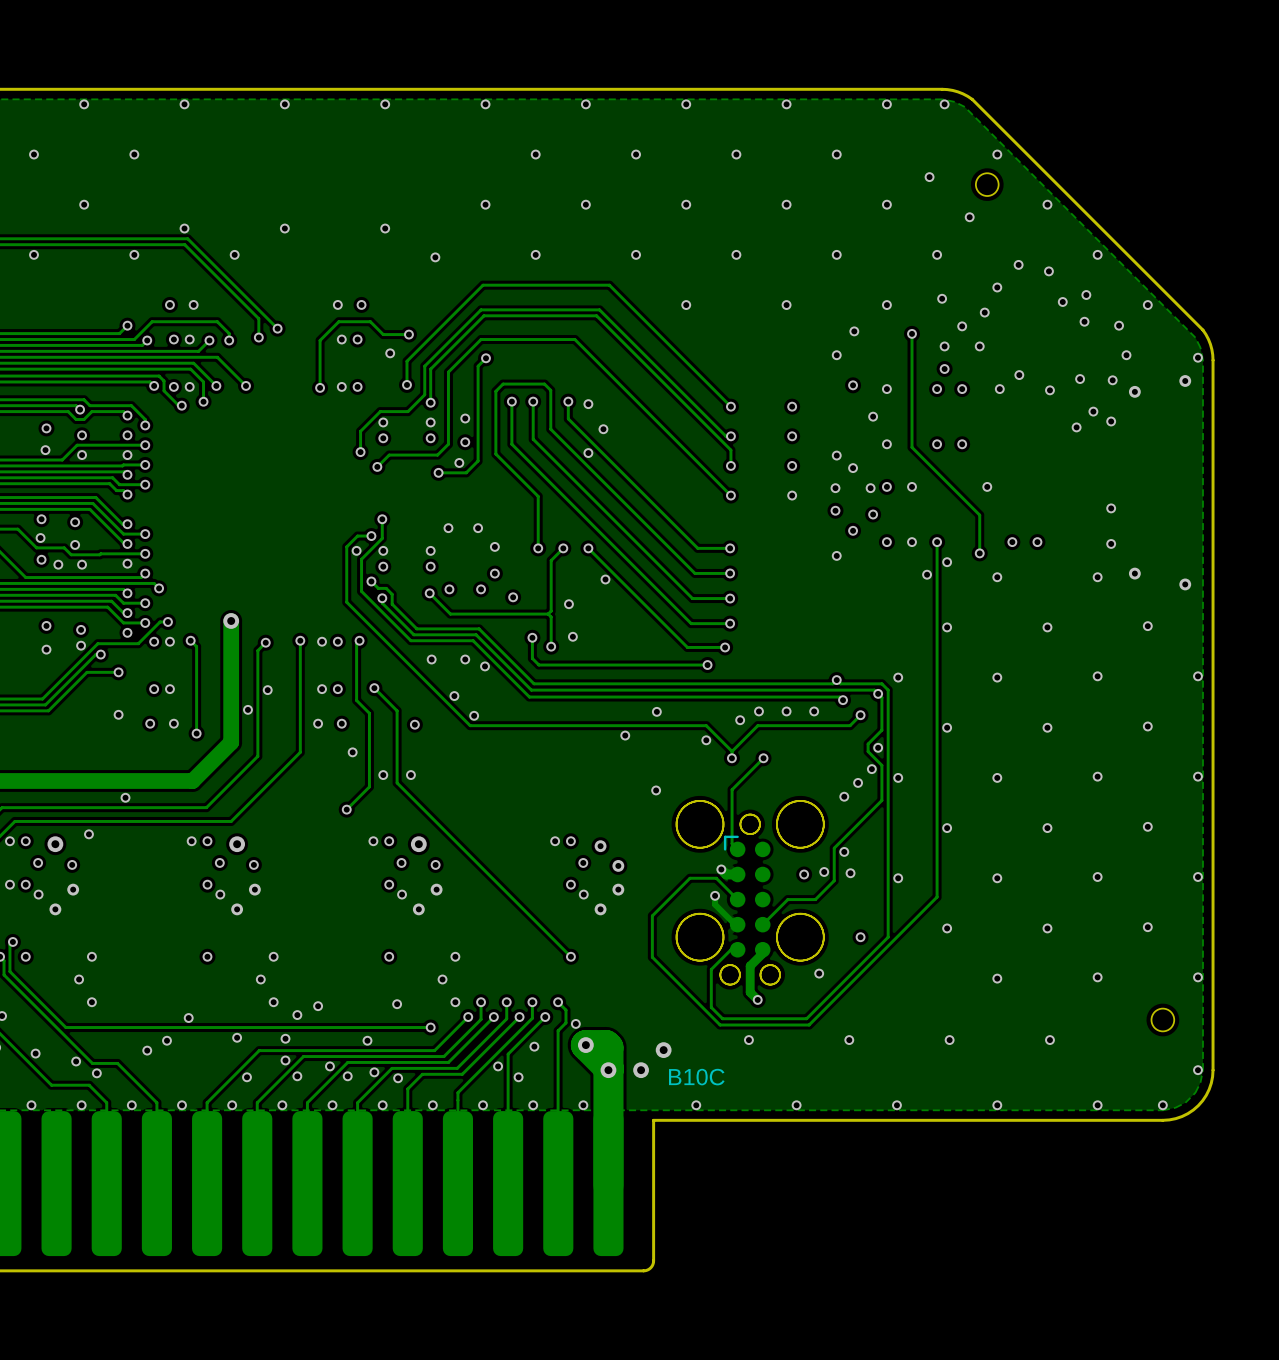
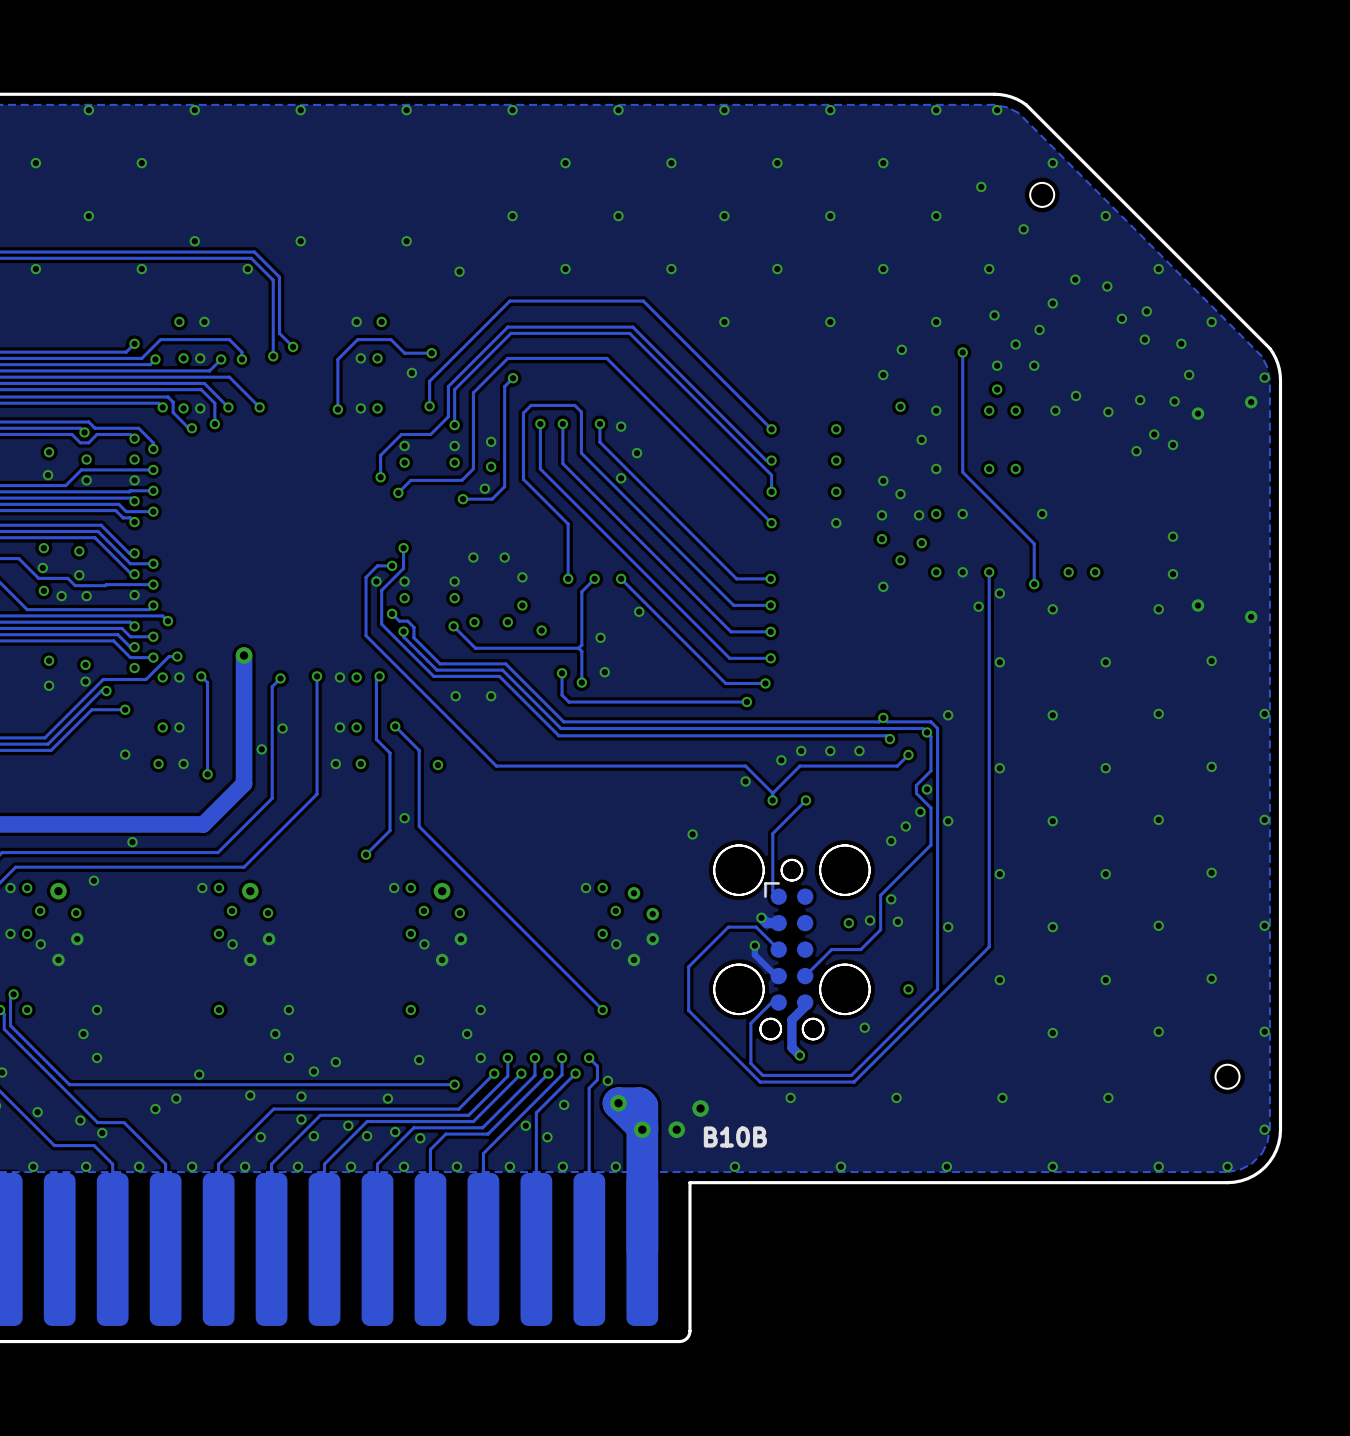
track: (187, 238) (264, 315) -> (198, 252) (254, 252) (279, 277) (279, 333)
track: (184, 244) (258, 318) -> (195, 258) (251, 258) (273, 280) (273, 336)
via: (485, 666) -> none
via: (454, 696) -> none
via: (656, 711) -> none
via: (474, 715) -> none
via: (625, 735) -> none
via: (352, 752) -> none
via: (410, 775) -> none
text: B10C (696, 1077) -> B10B (735, 1137)

